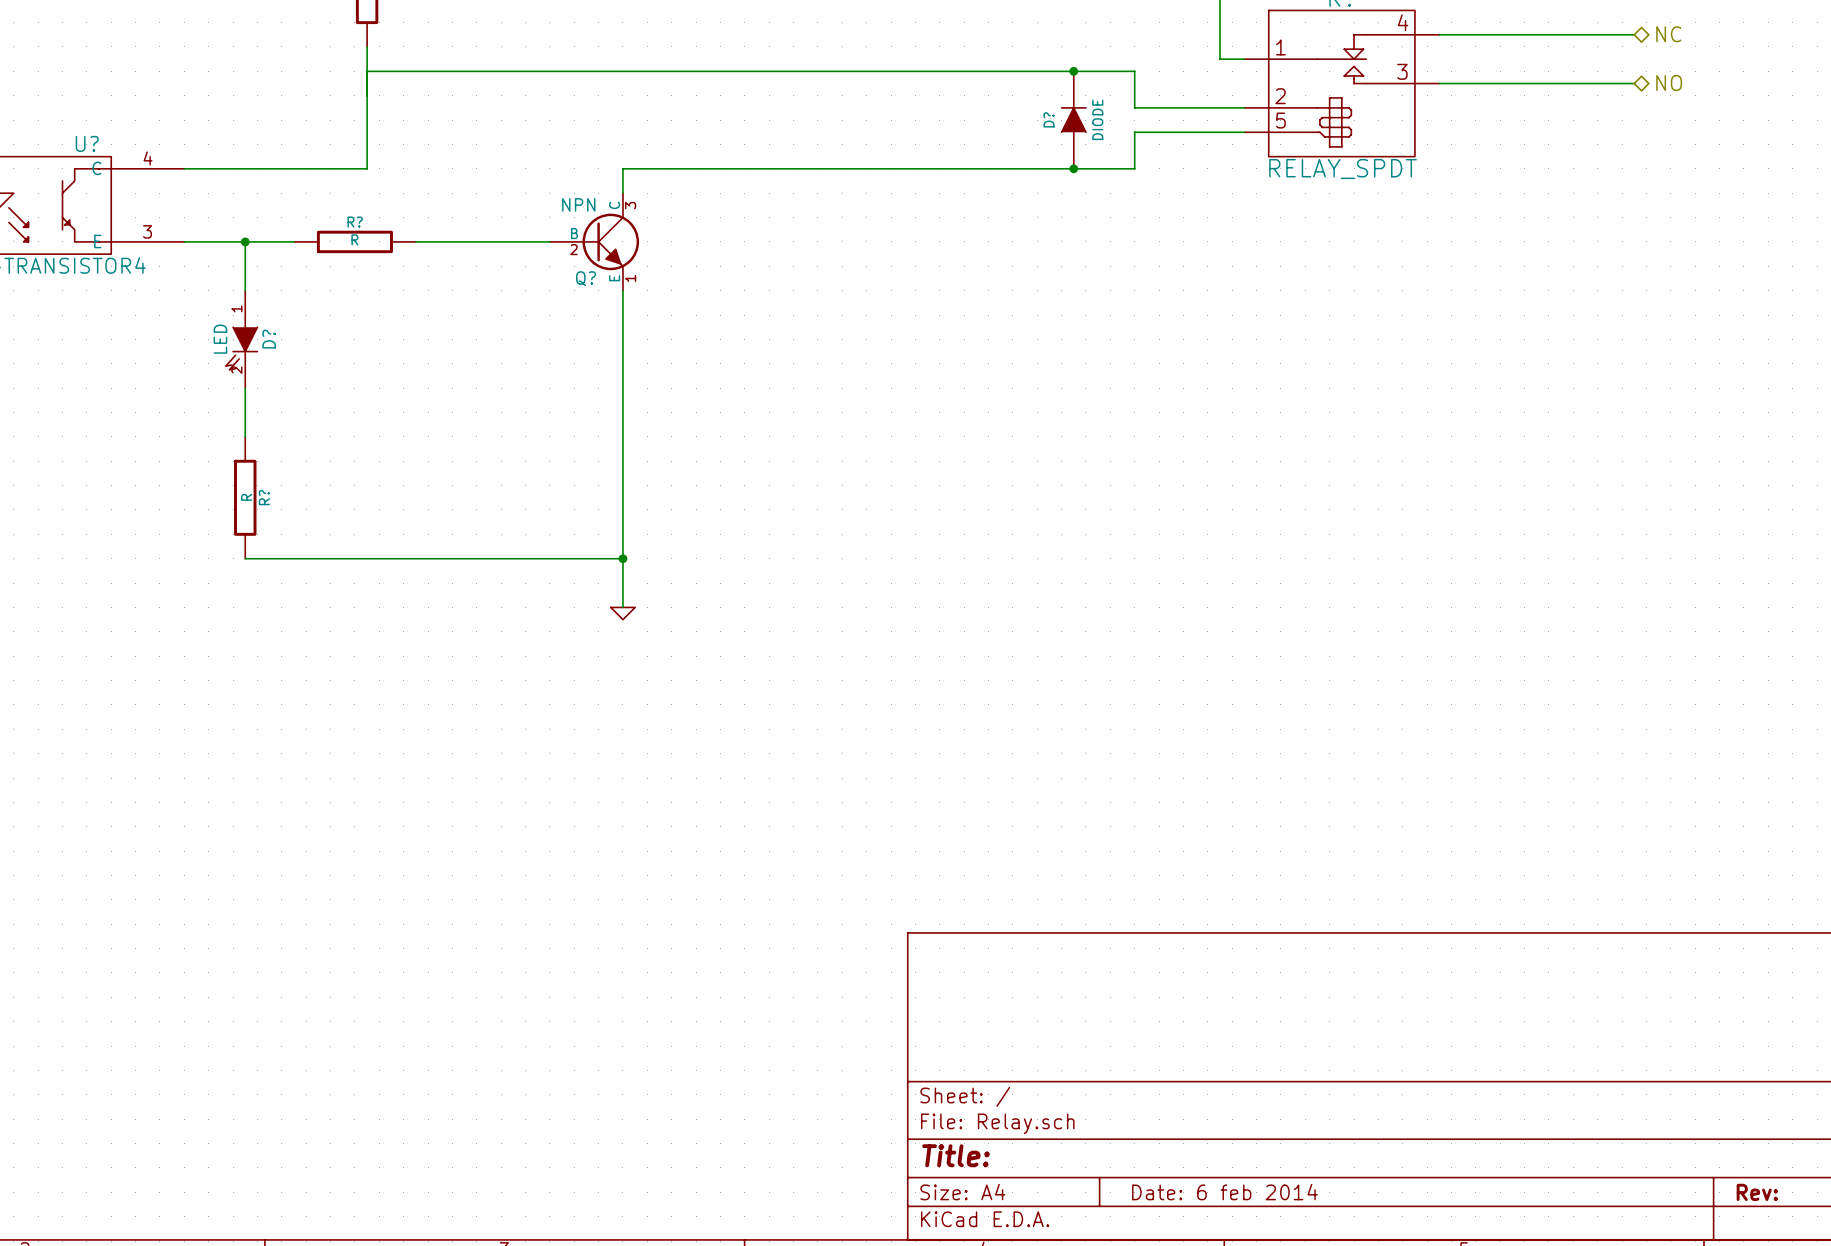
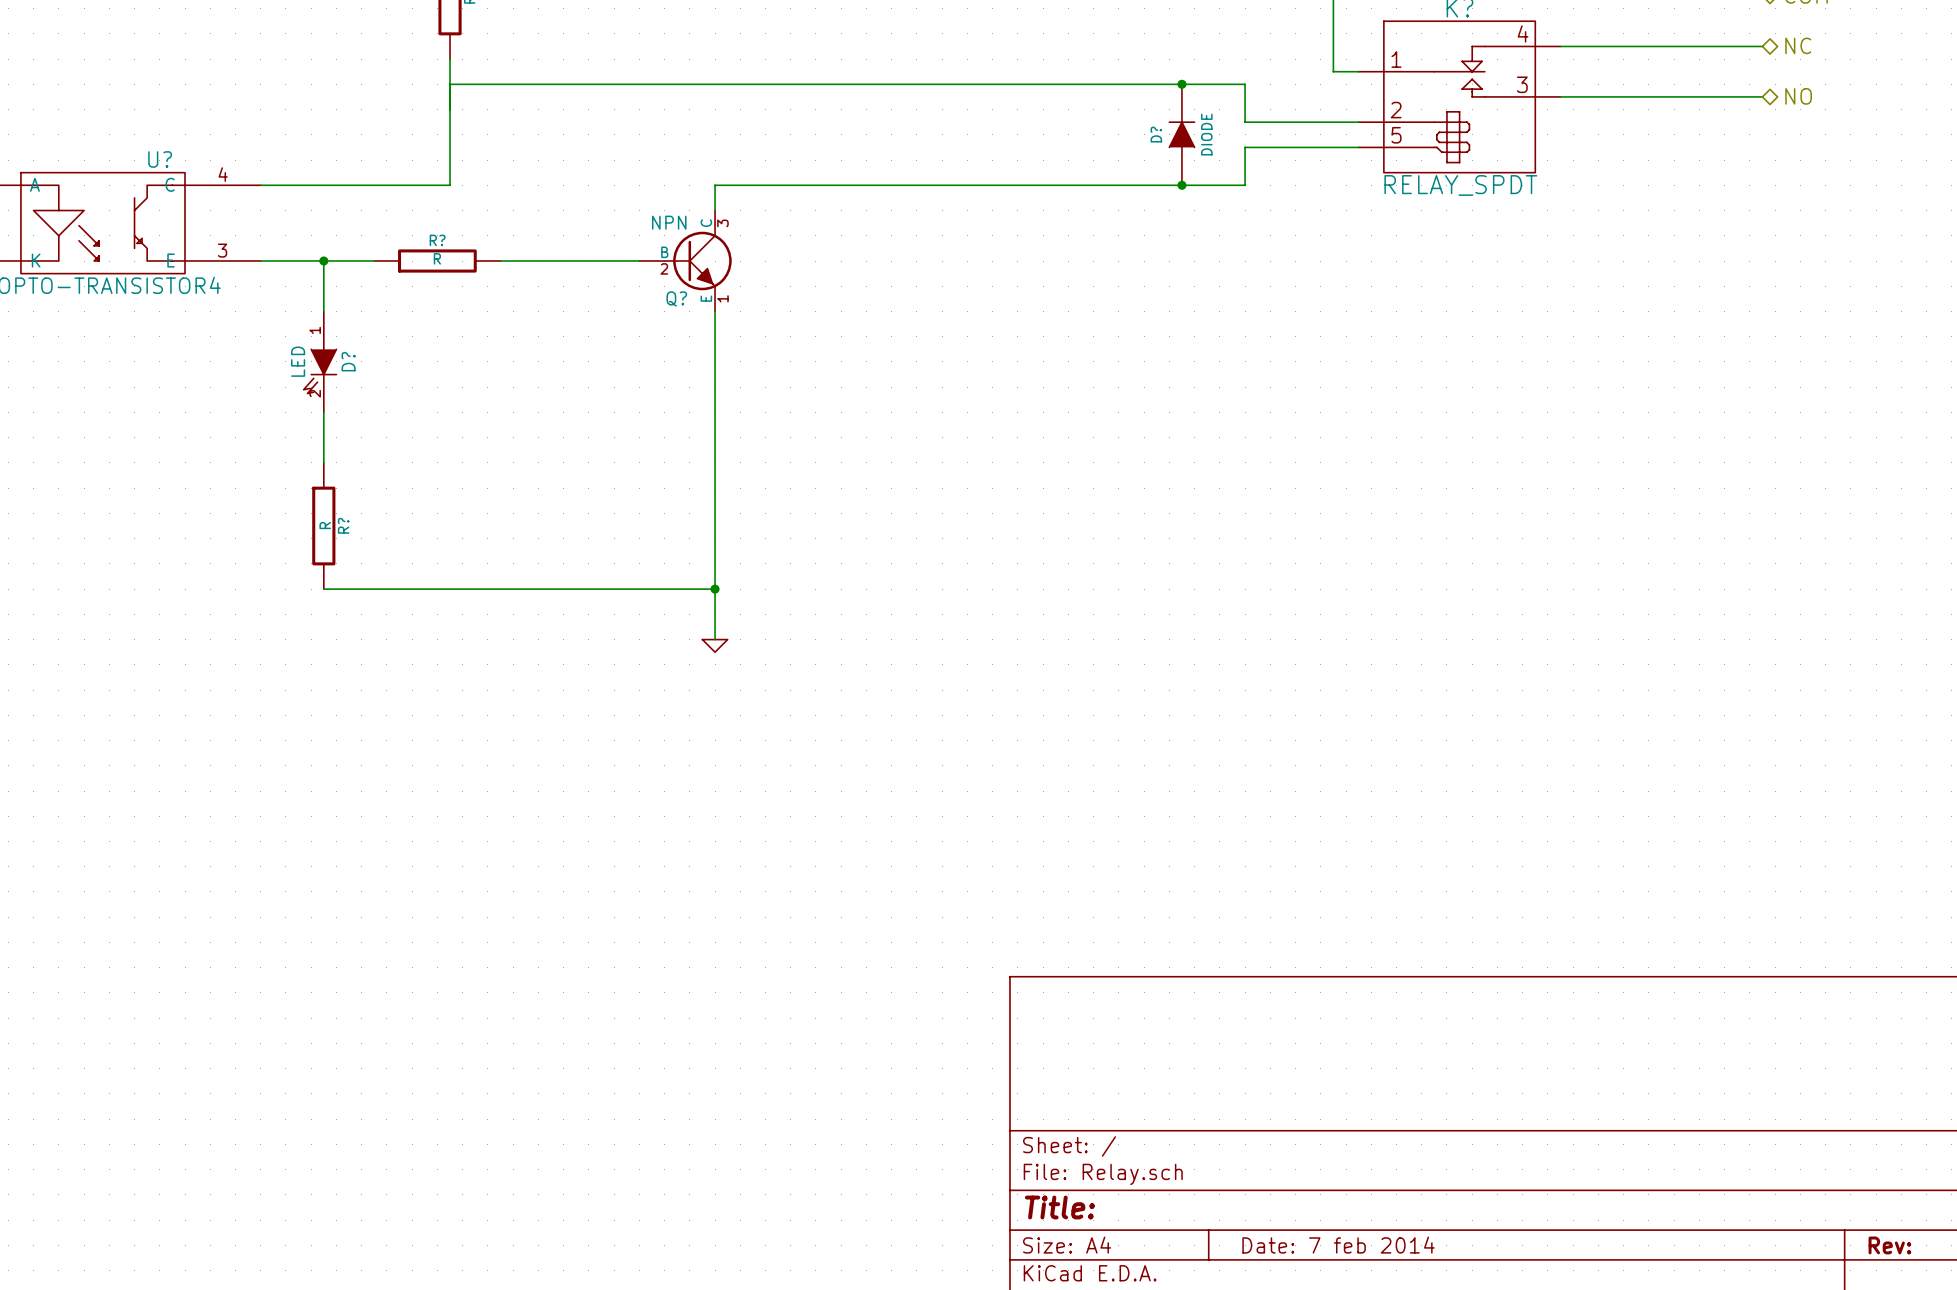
title block: Date: 6 feb 2014 (1224, 1192) -> Date: 7 feb 2014 (1338, 1245)

